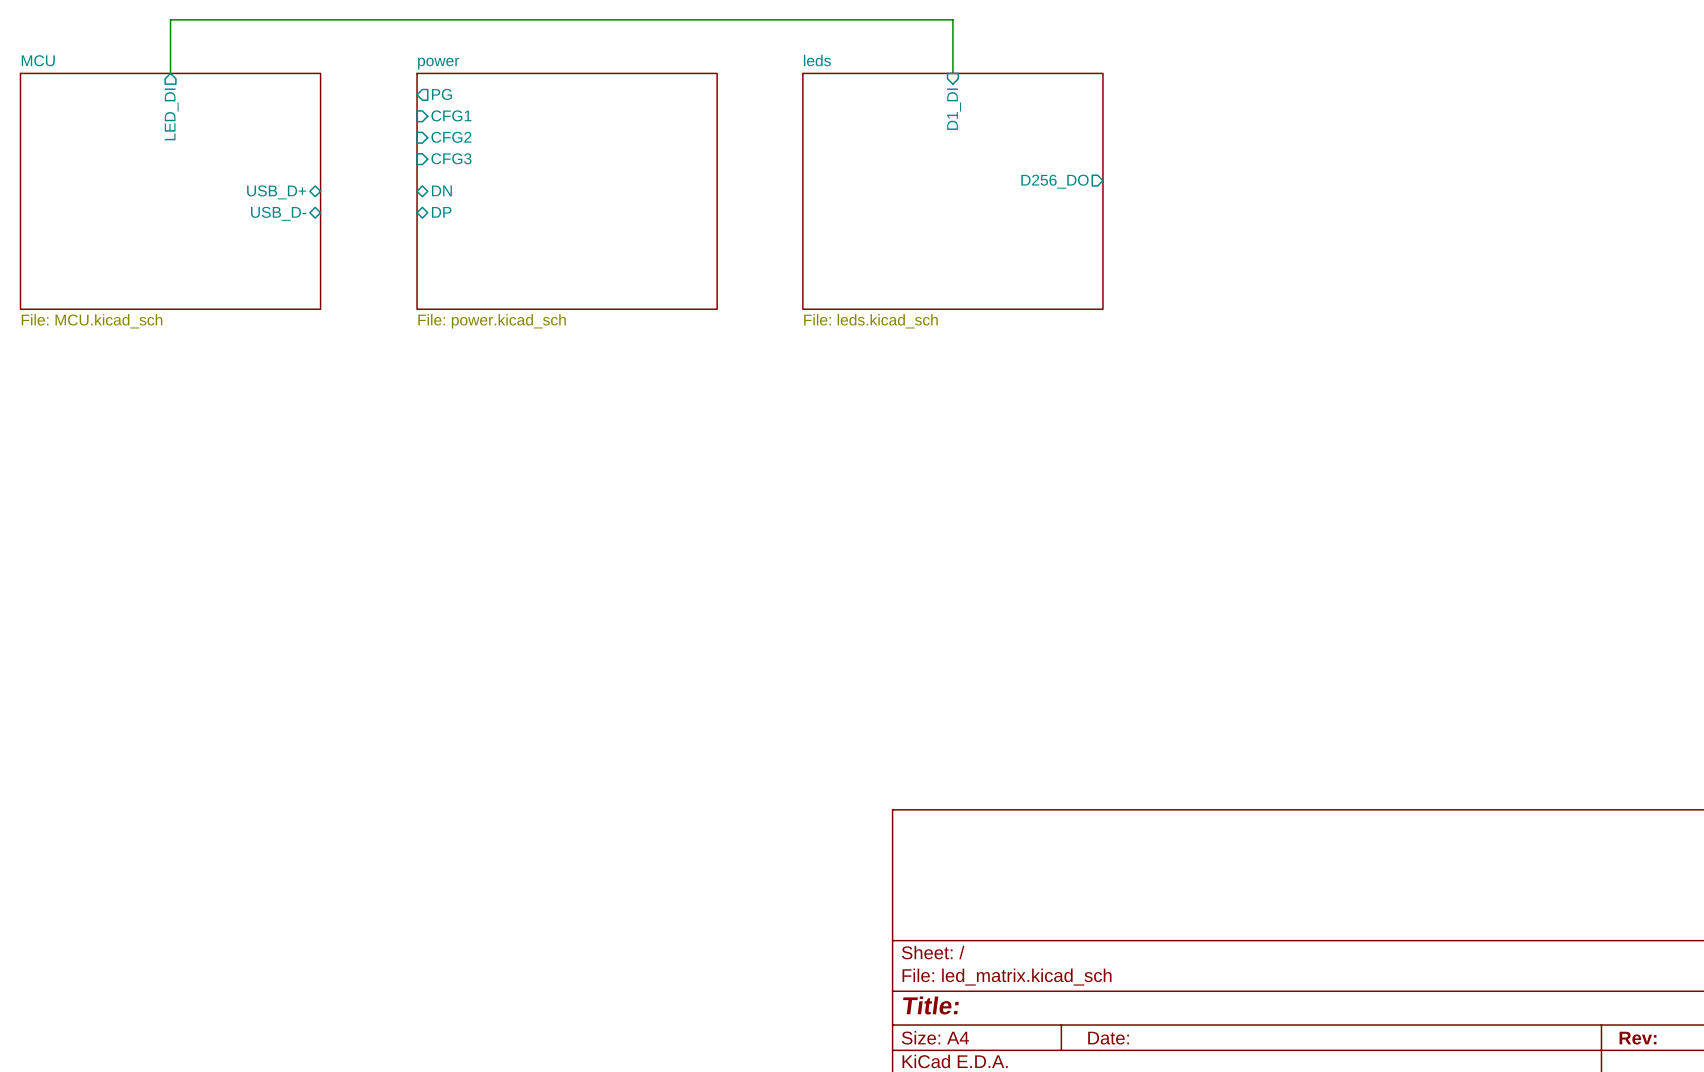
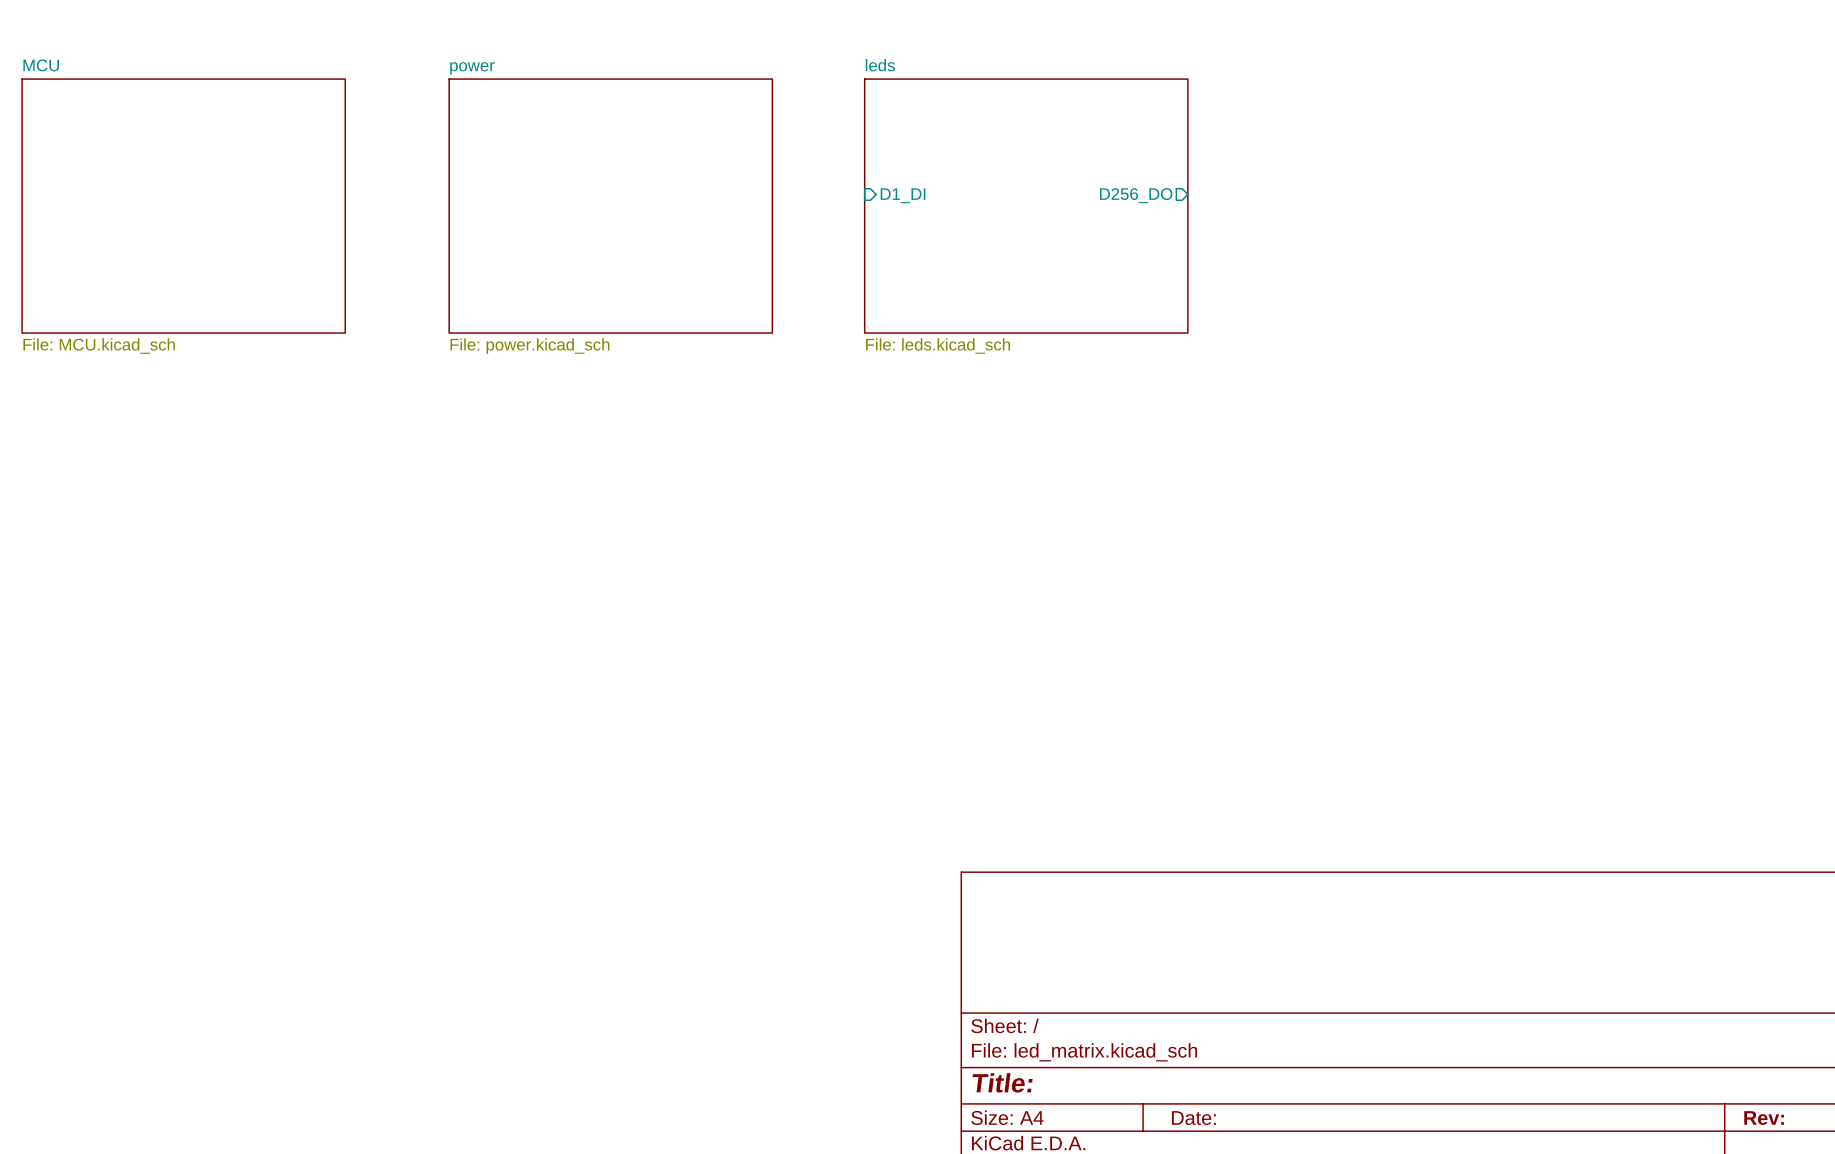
wire: (170, 73) (170, 19) (952, 19) (952, 73) -> none
sheet pin: PG (441, 94) -> none
sheet pin rotation: 0° (954, 109) -> 90° counterclockwise (903, 195)
sheet pin position: D1_DI (954, 109) -> D1_DI (903, 195)
sheet pin: LED_DI (171, 114) -> none
sheet pin: CFG1 (451, 115) -> none
sheet pin: CFG2 (451, 137) -> none
sheet pin: CFG3 (451, 158) -> none
sheet pin: DN (441, 190) -> none
sheet pin: USB_D+ (276, 192) -> none
sheet pin: DP (441, 212) -> none
sheet pin: USB_D- (278, 213) -> none

